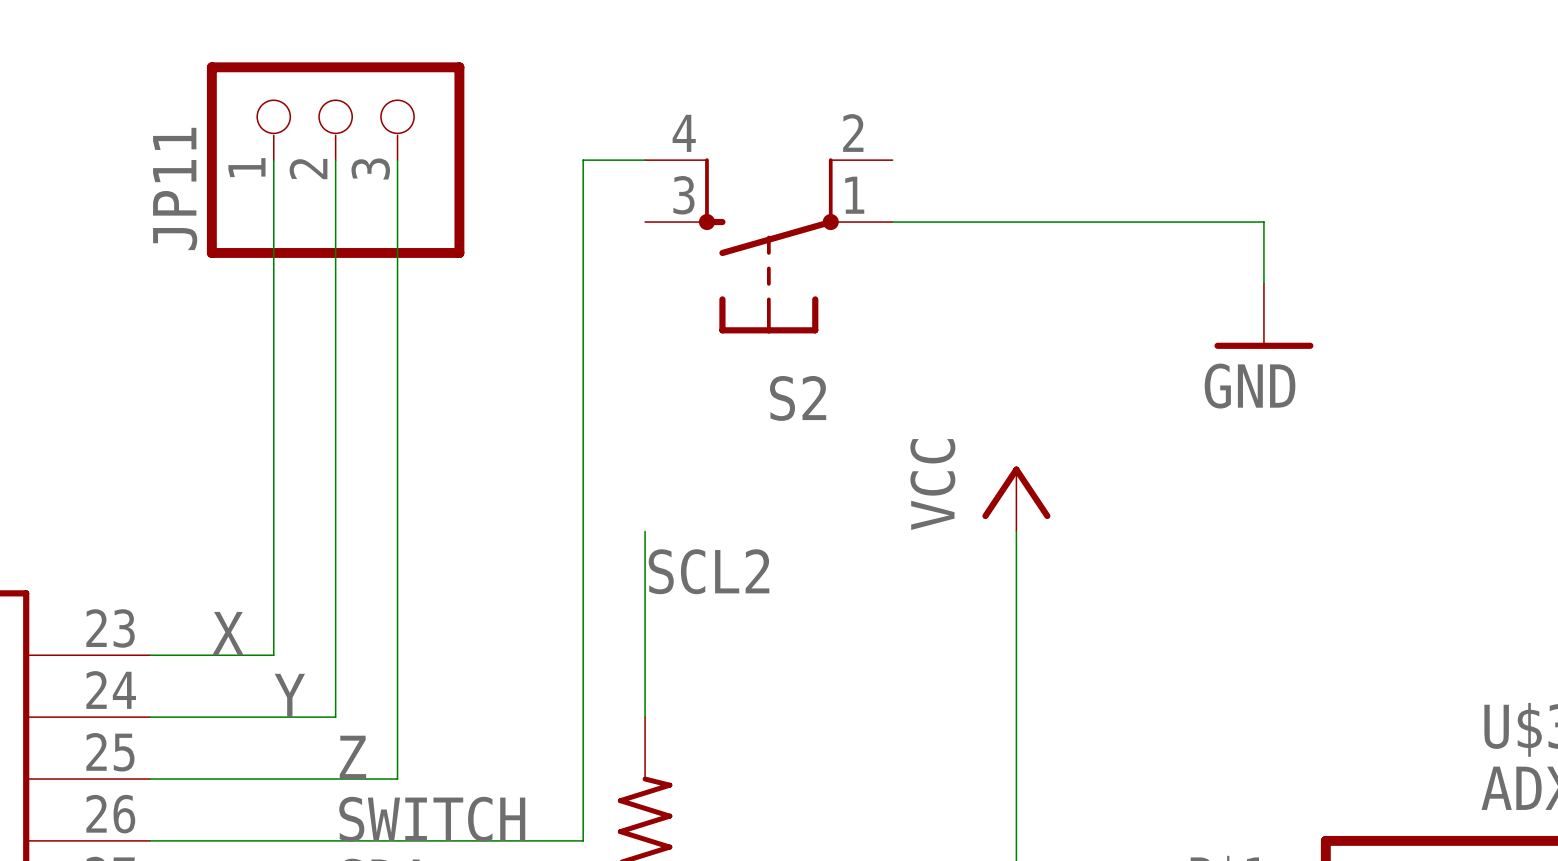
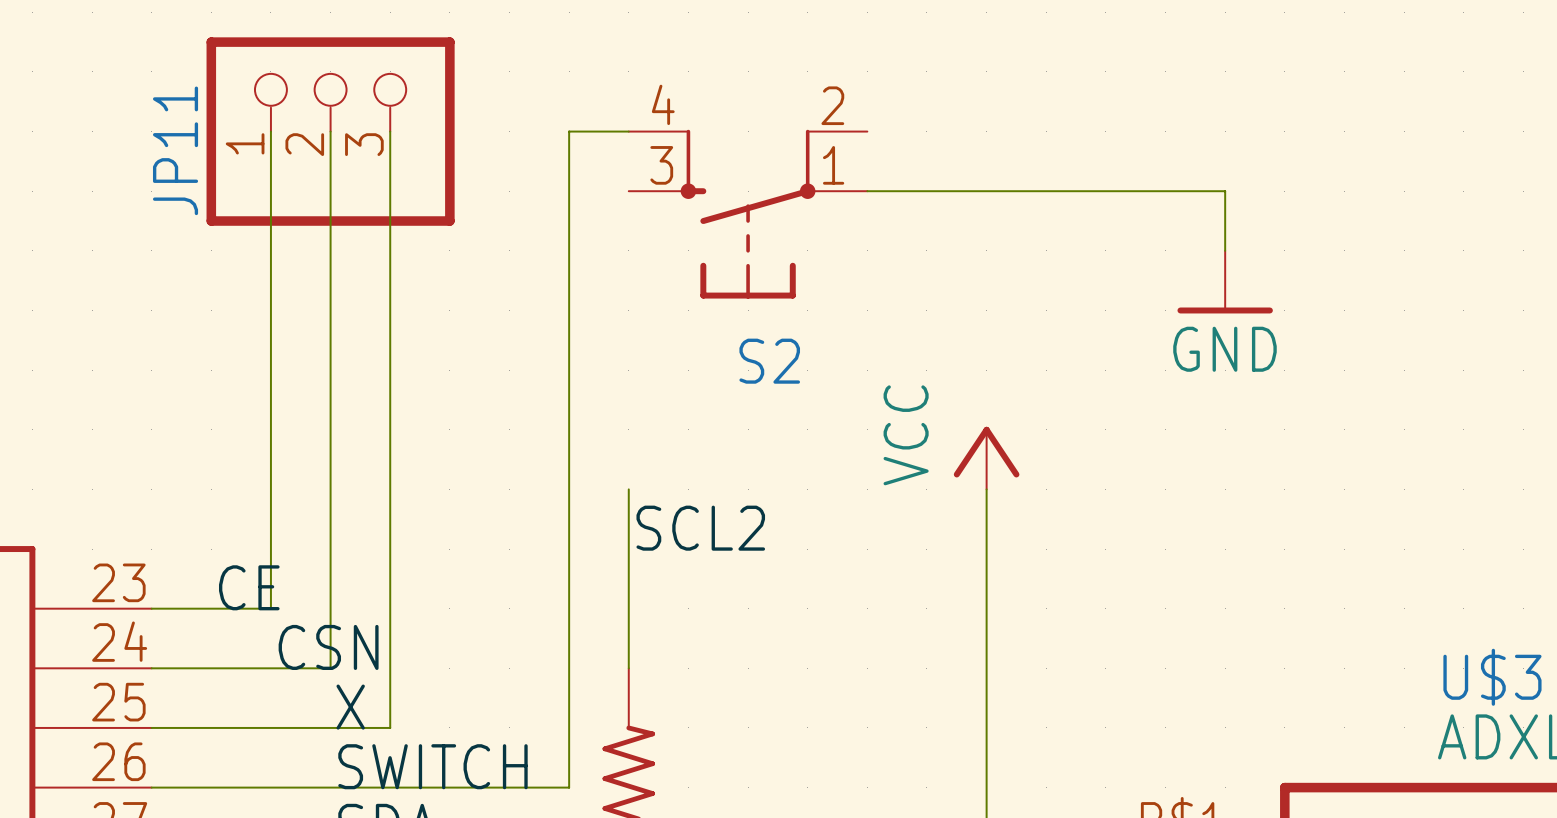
label: X (227, 633) -> CE (249, 587)
label: Y (289, 695) -> CSN (328, 647)
label: Z (352, 757) -> X (350, 707)

